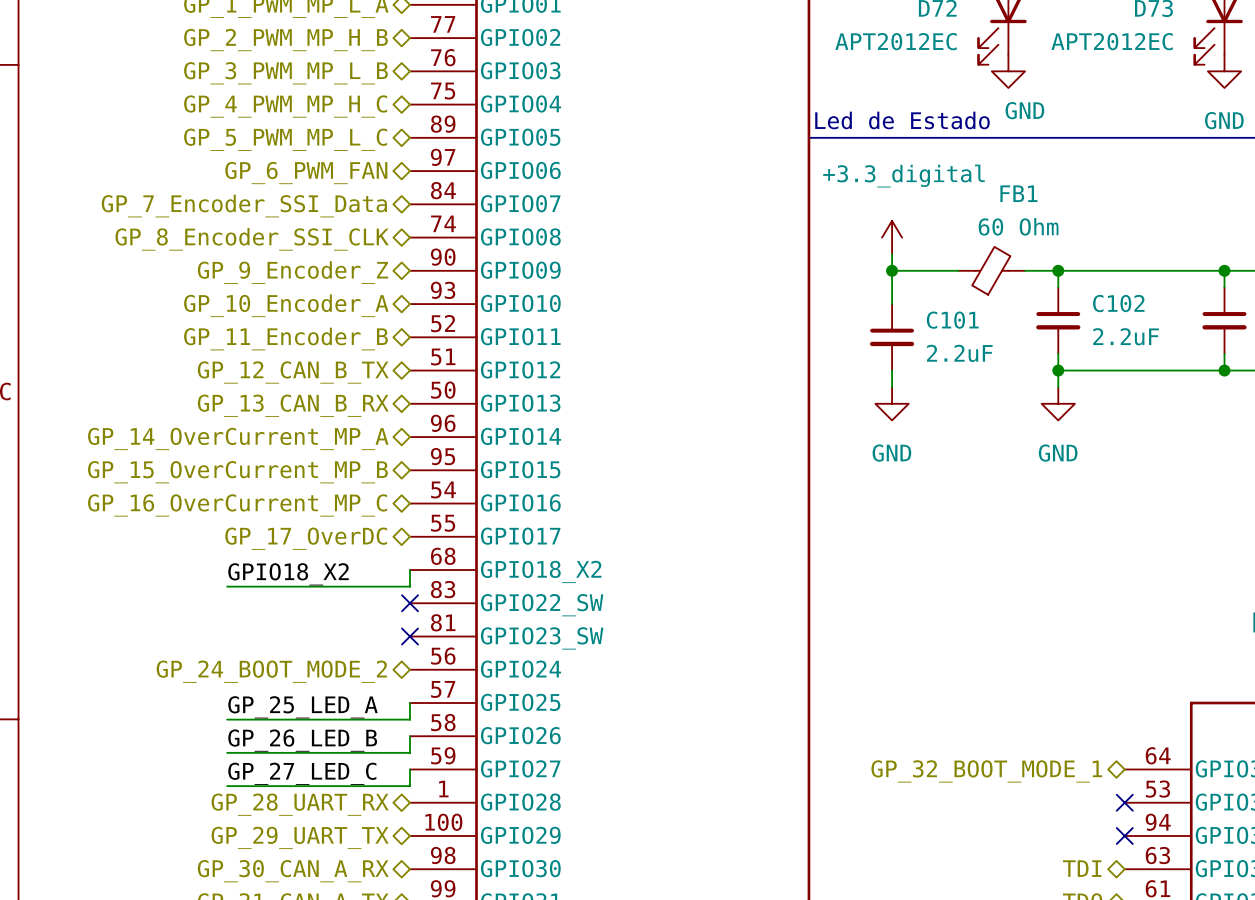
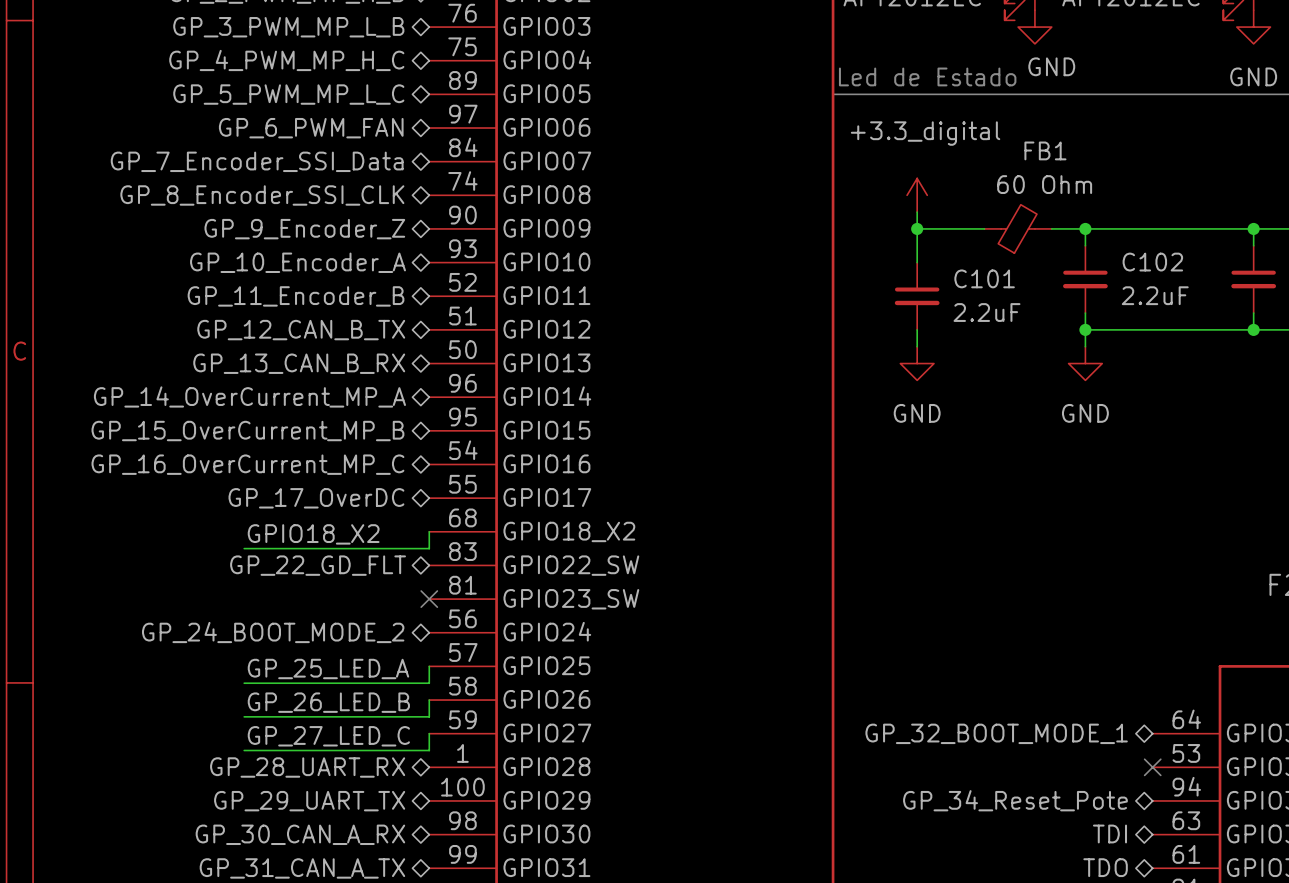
no-connect mark: (410, 603) -> none
hierarchical label: none -> GP_22_GD_FLT (318, 565)
no-connect mark: (1124, 835) -> none
hierarchical label: none -> GP_34_Reset_Pote (1015, 800)

